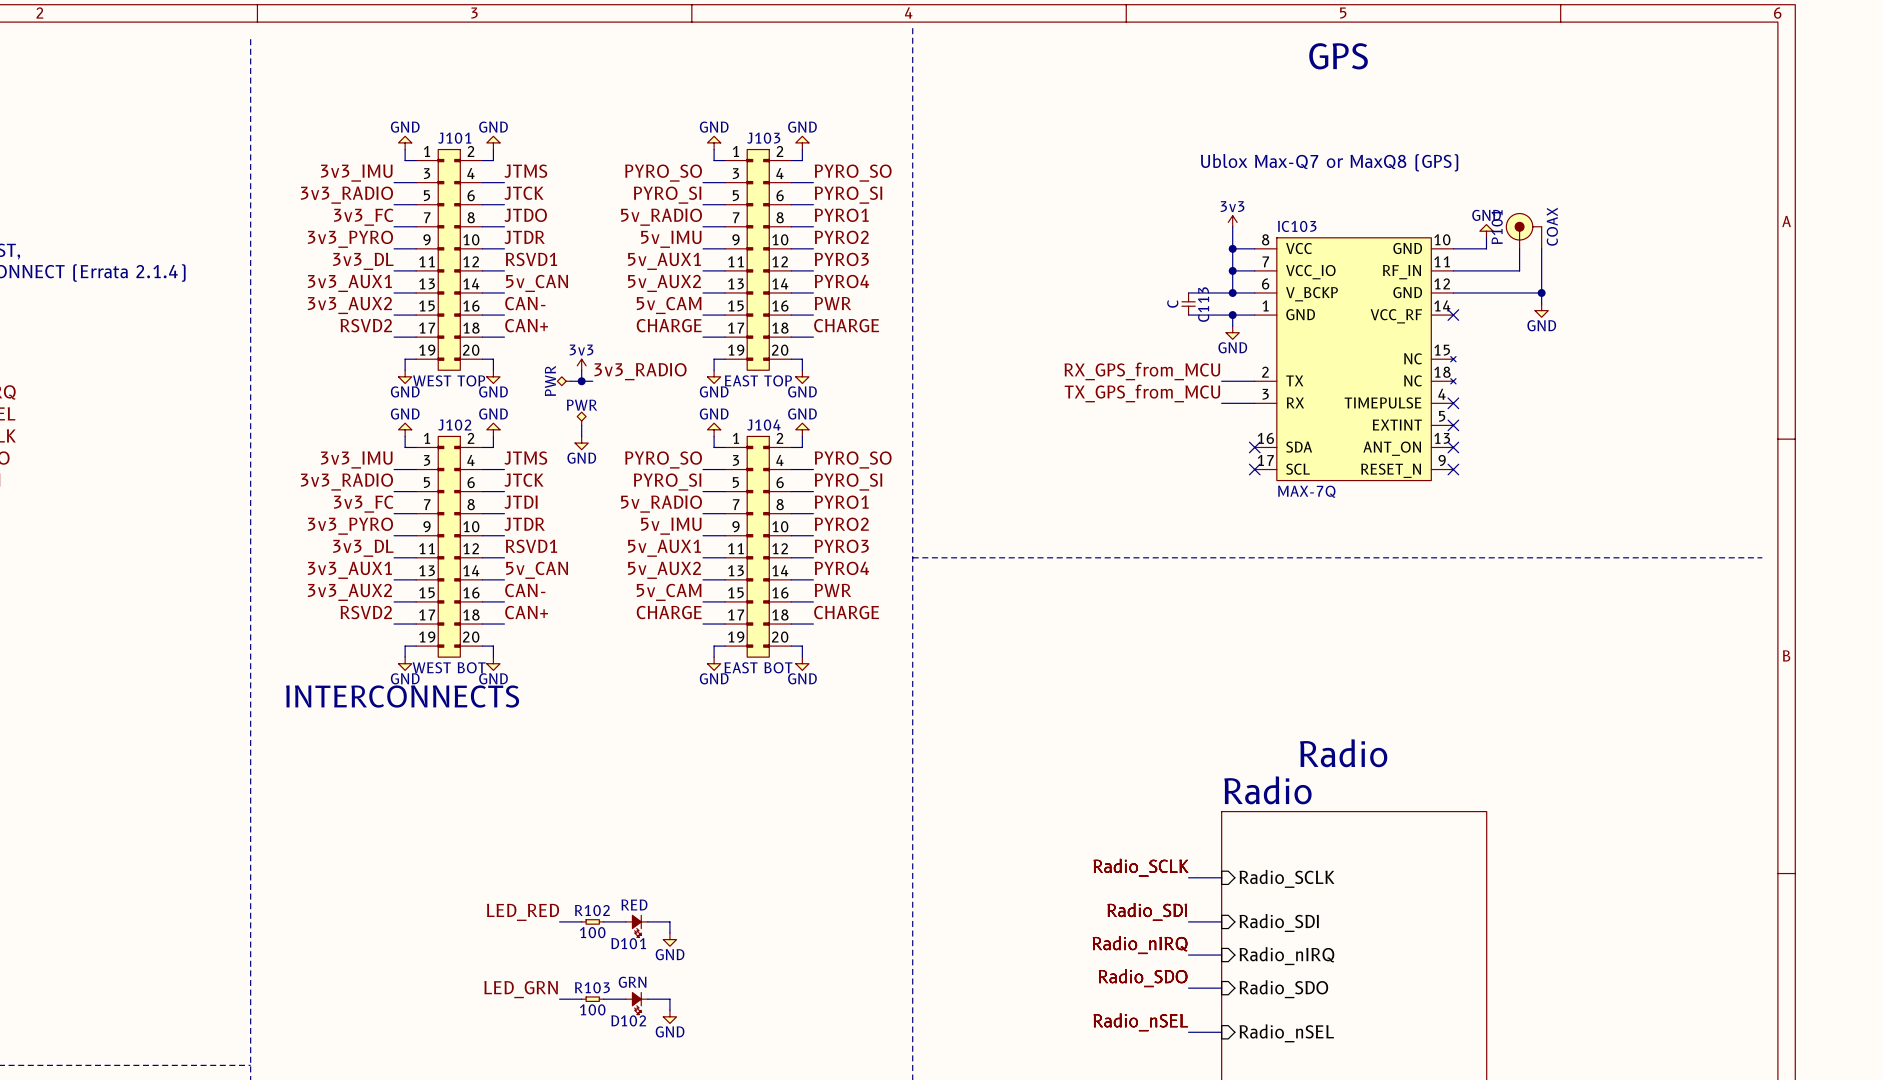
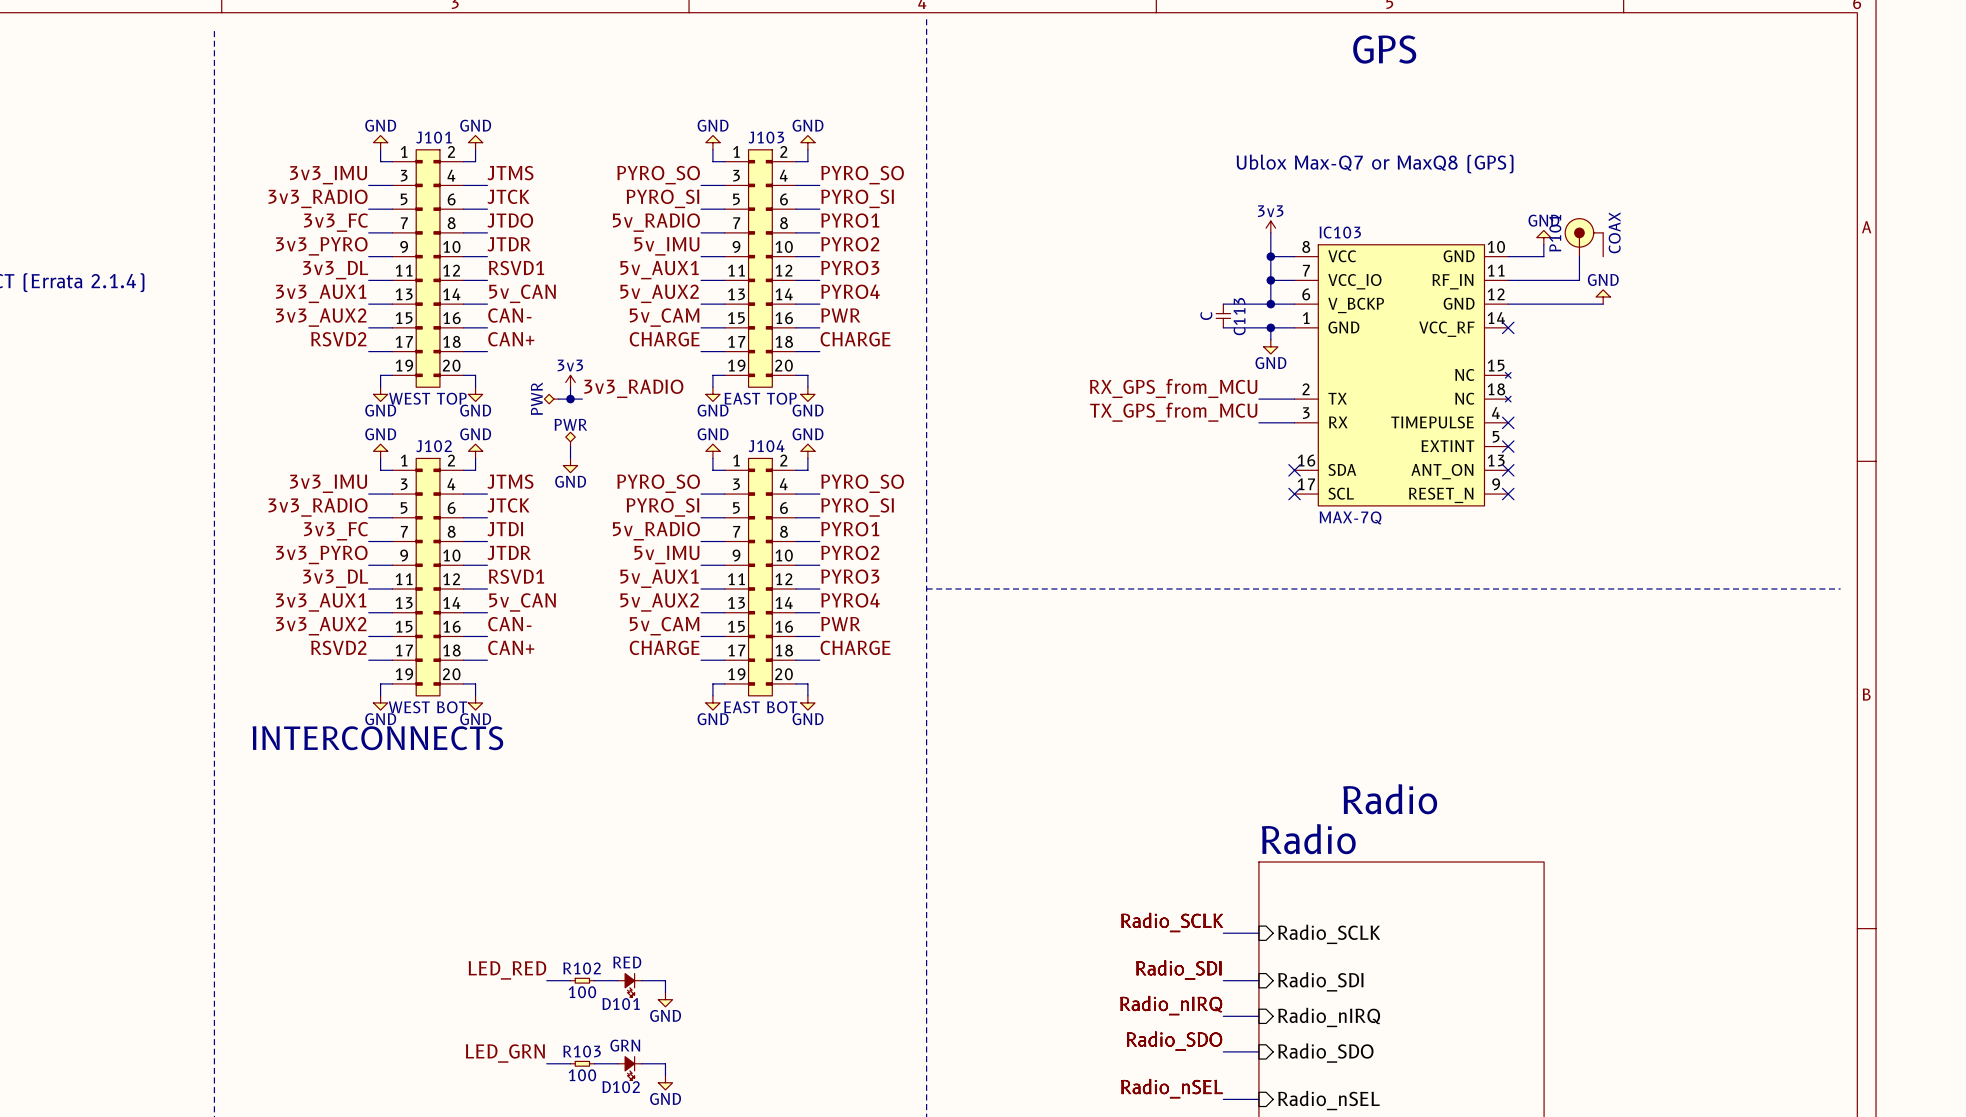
wire: (1541, 248) (1541, 304) -> none
junction: (1541, 292) -> none
power symbol rotation: 0° (1541, 310) -> 180° (1603, 297)
power symbol position: GND (1541, 310) -> GND (1603, 297)

